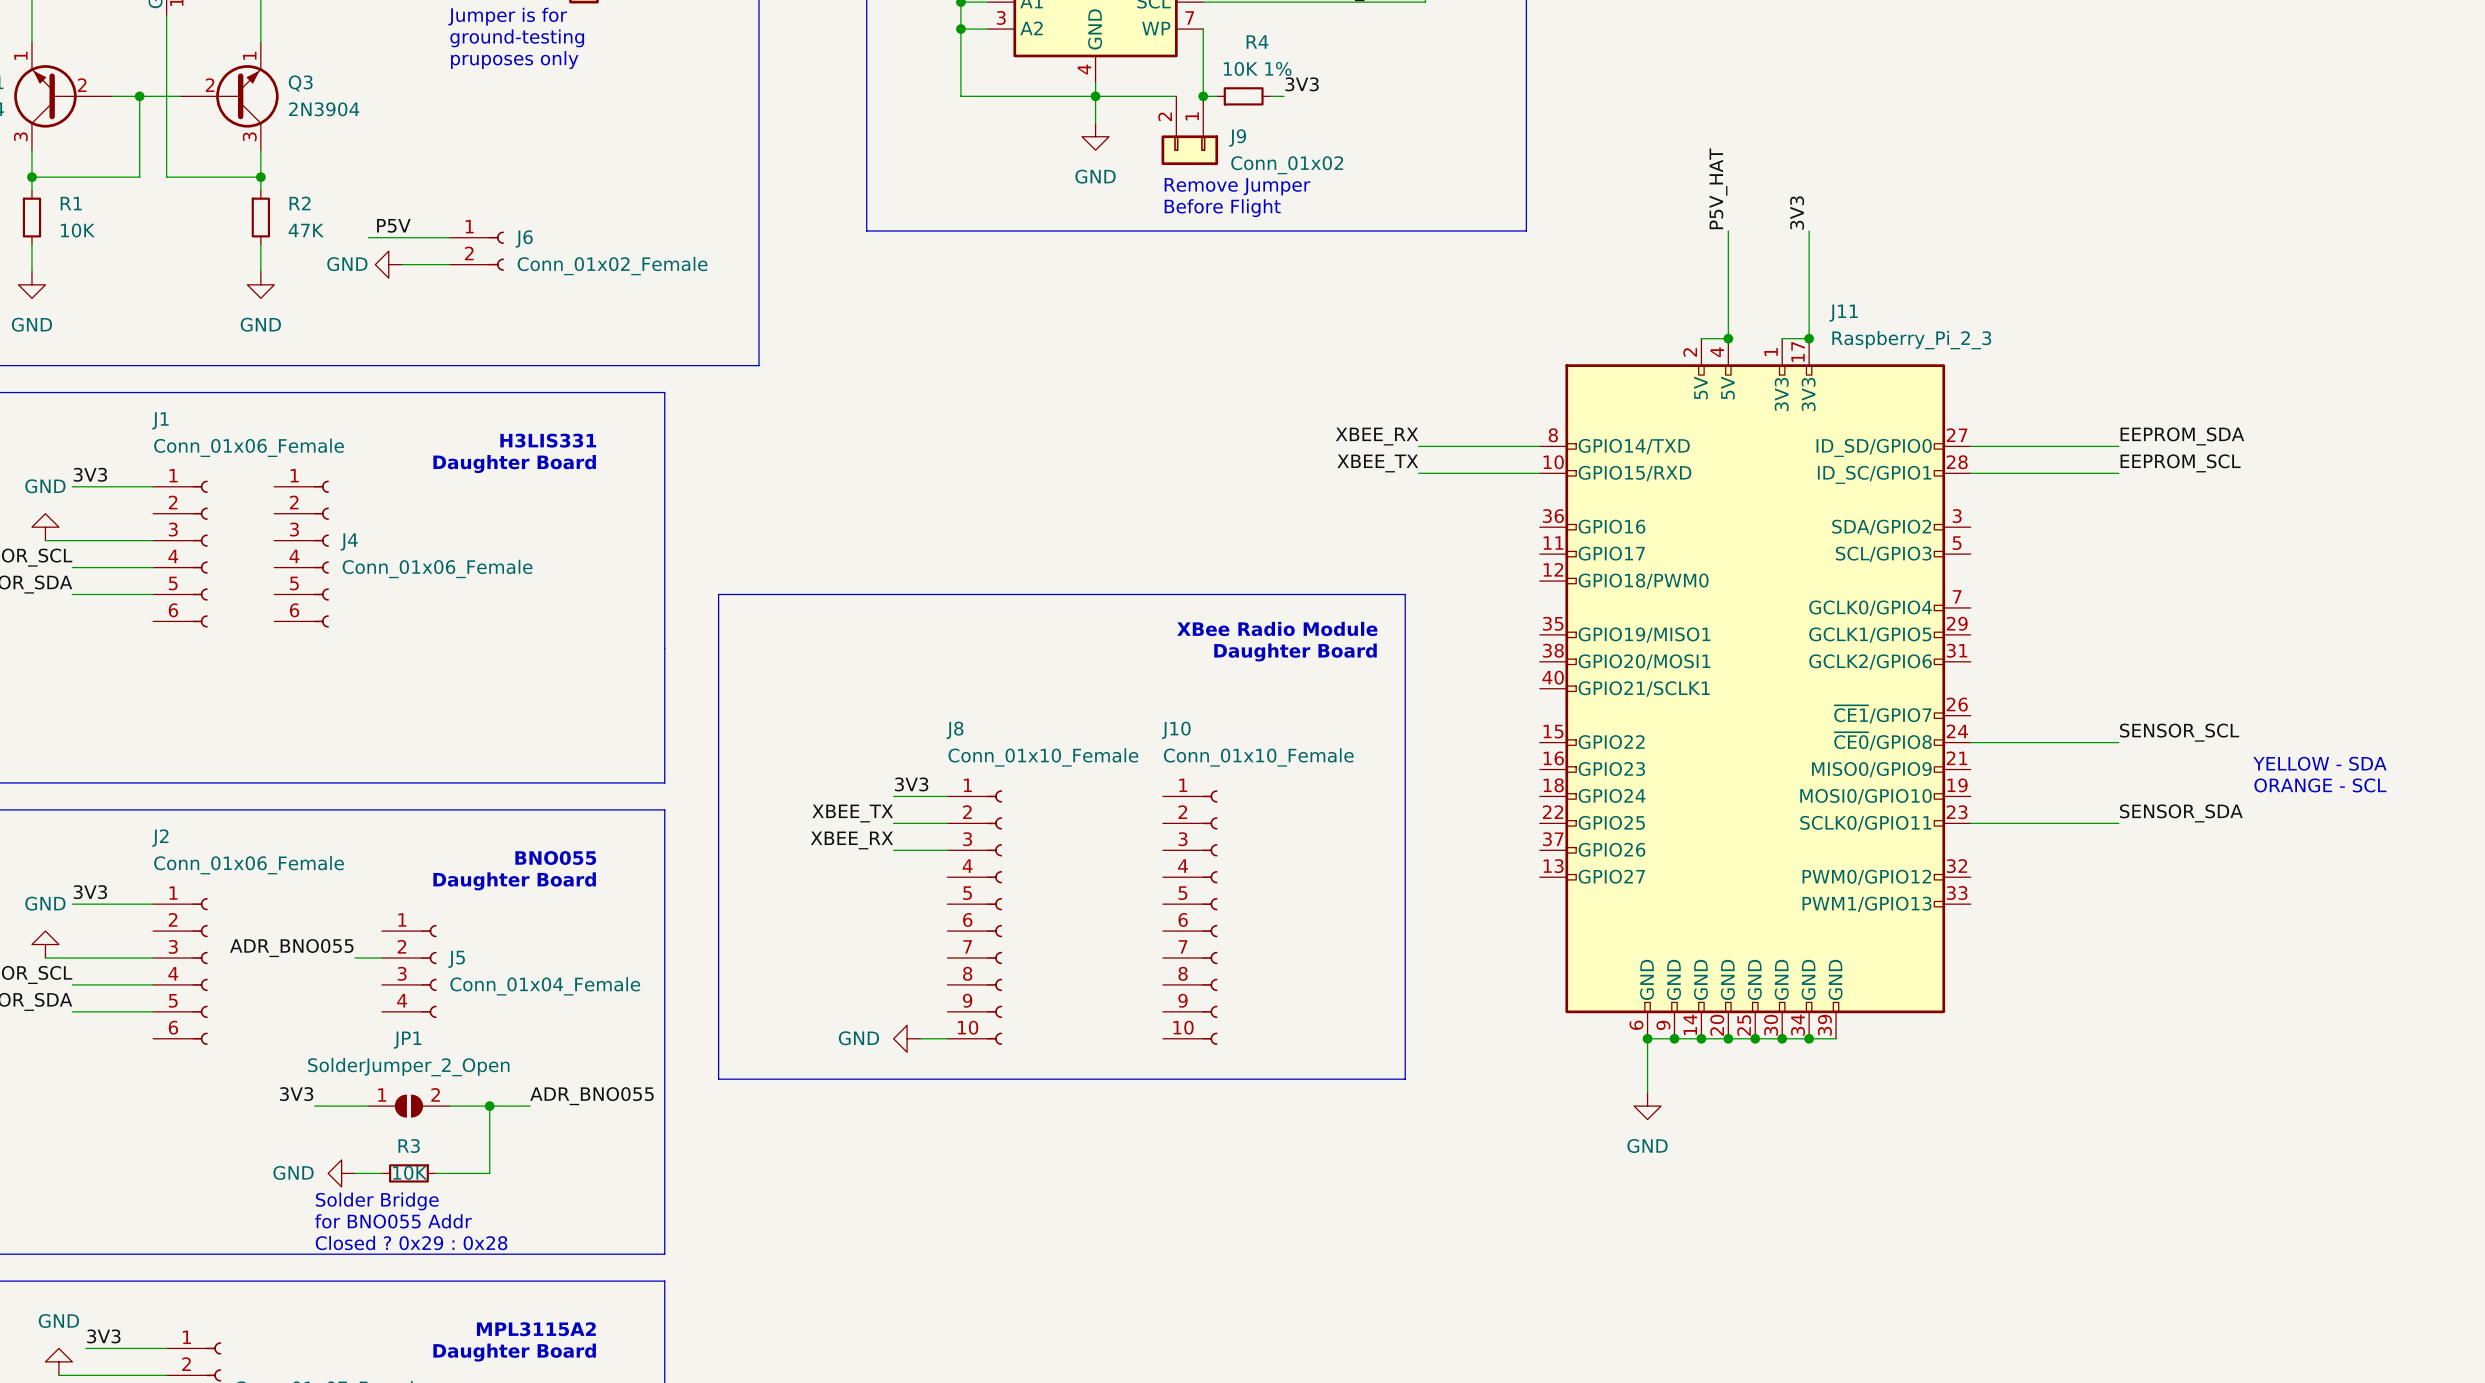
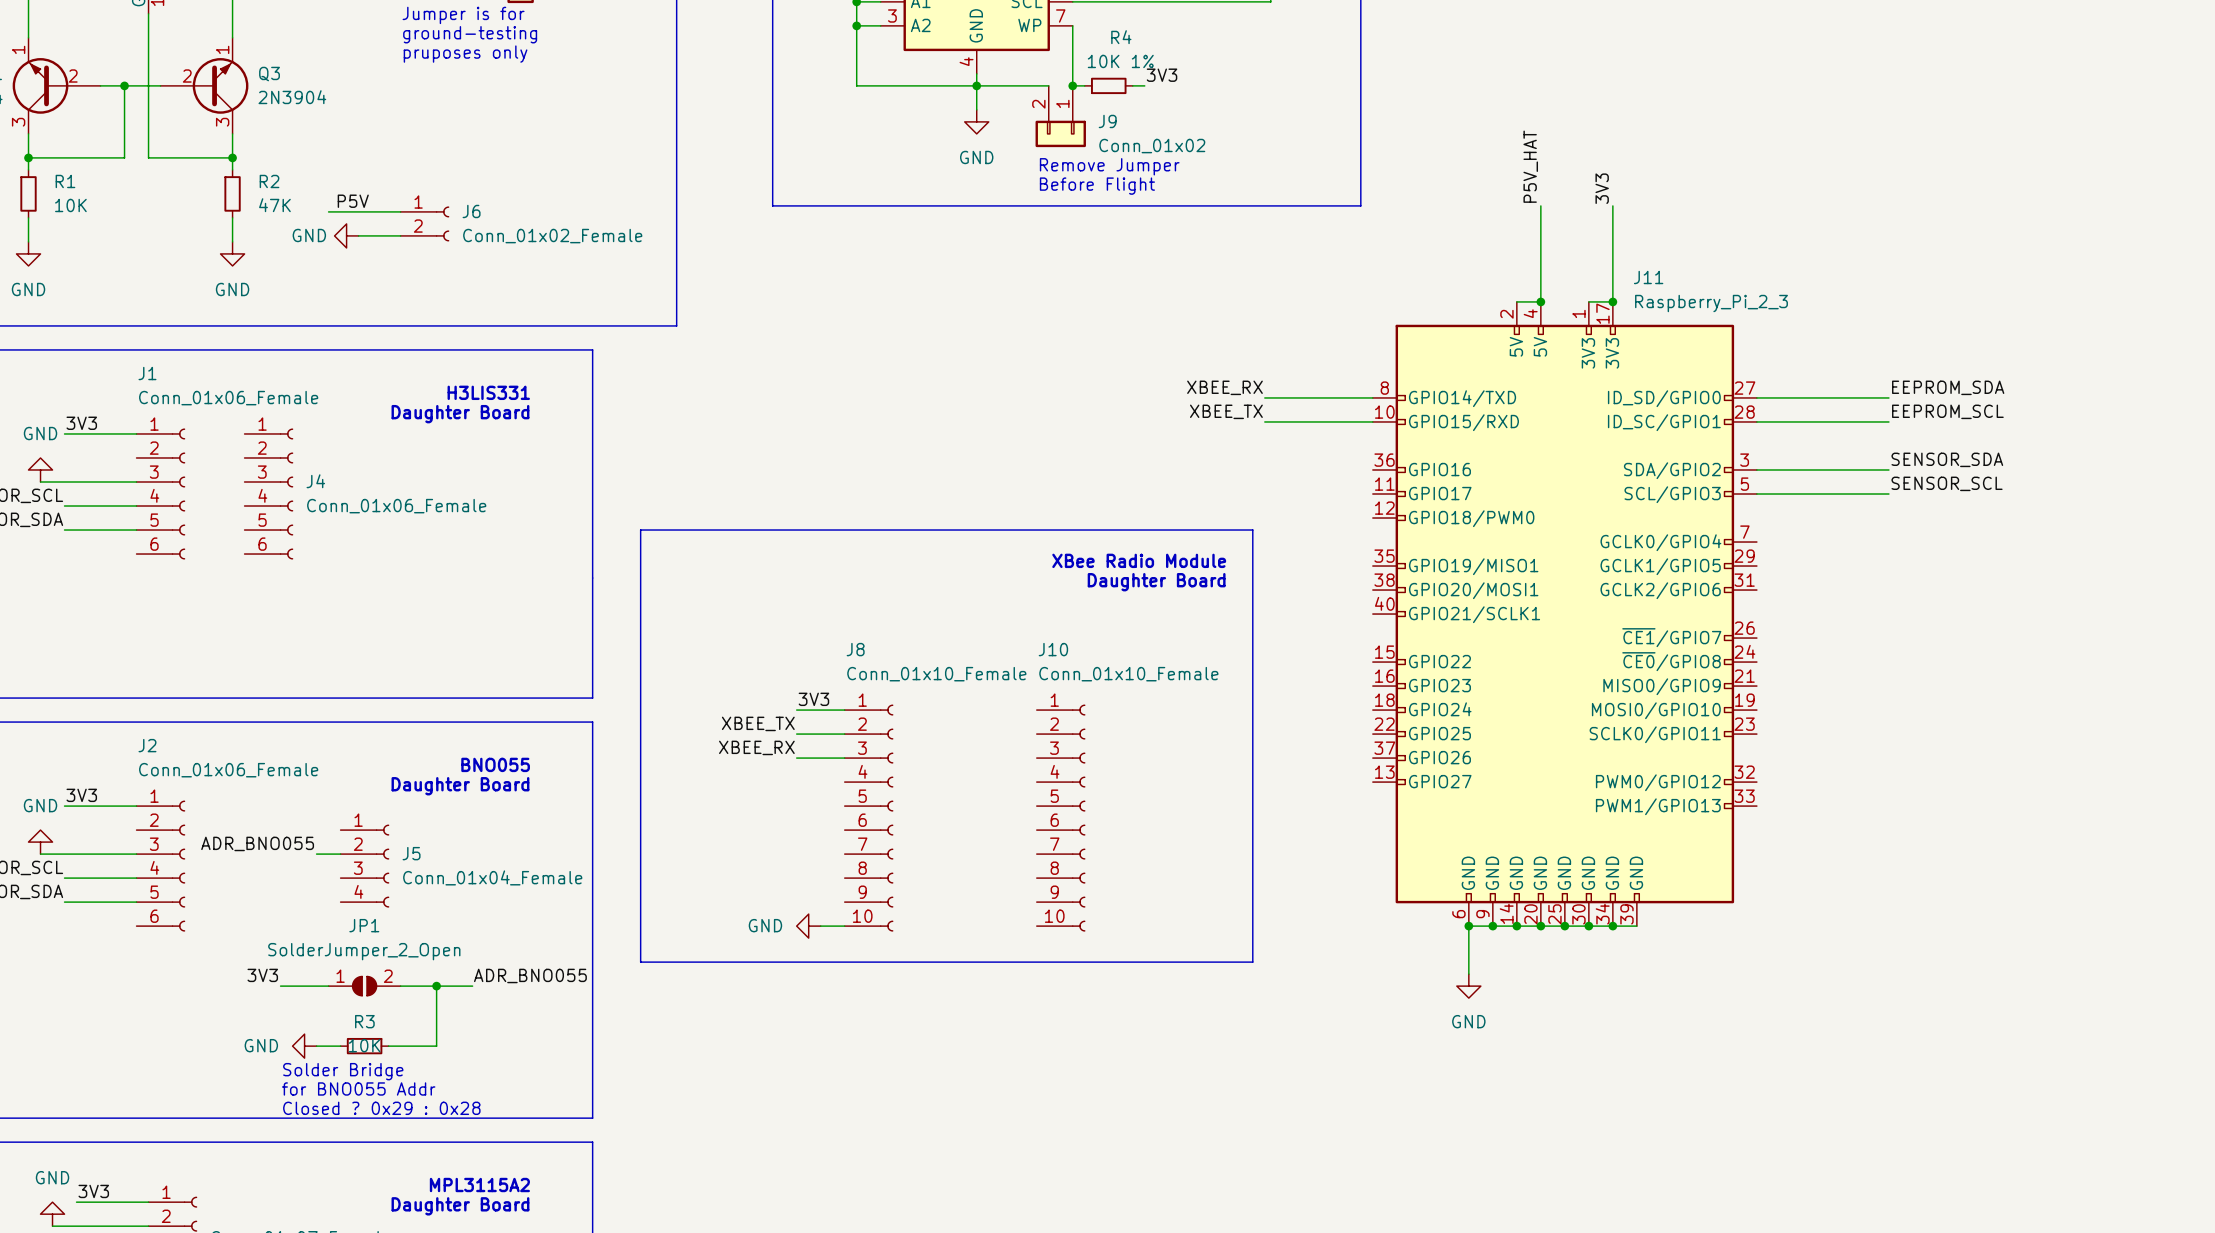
label: none -> SENSOR_SDA (1947, 459)
wire: none -> (1756, 469) (1888, 469)
label position: SENSOR_SCL (2179, 732) -> SENSOR_SCL (1947, 483)
wire: (1970, 742) (2118, 742) -> (1756, 494) (1888, 494)
text: YELLOW - SDA (2319, 763) -> none
text: ORANGE - SCL (2320, 785) -> none
label: SENSOR_SDA (2181, 813) -> none
wire: (1970, 823) (2118, 823) -> none

